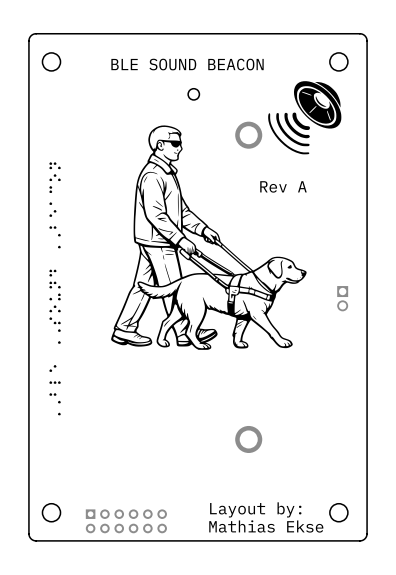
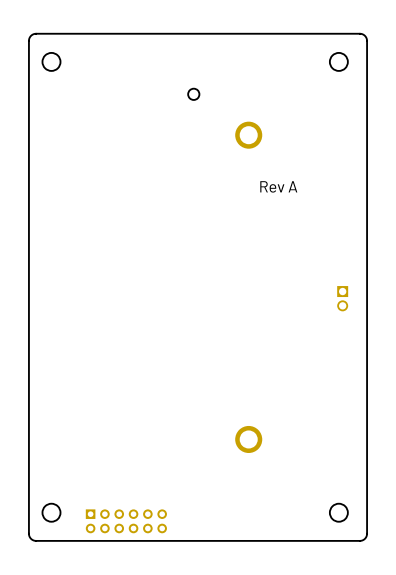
text: BLE SOUND BEACON (187, 64) -> none
drawing: [111, 81, 342, 350] -> none
drawing: [49, 162, 61, 416] -> none
text: Layout by: (255, 509) -> none
text: Mathias Ekse (266, 526) -> none

